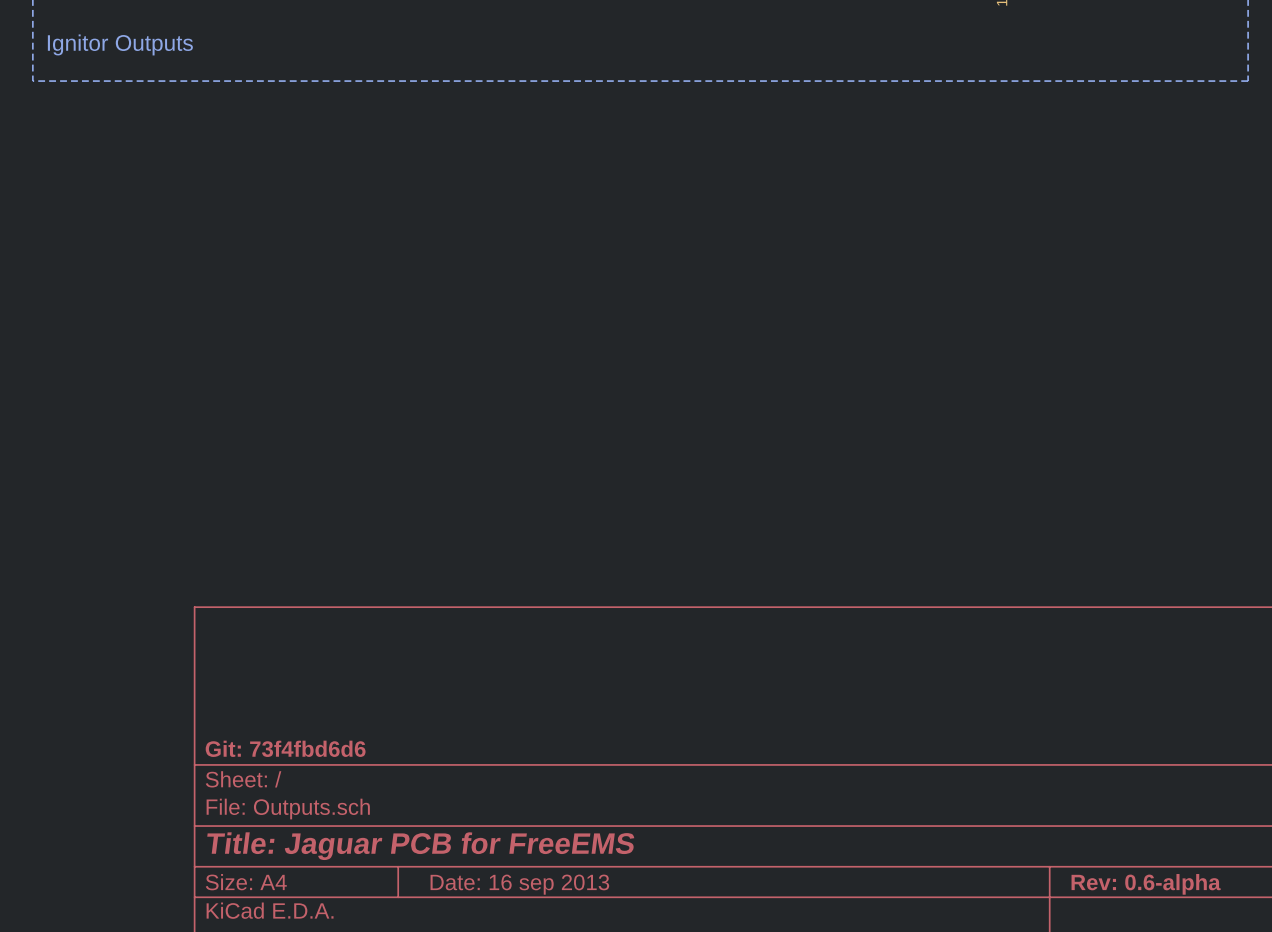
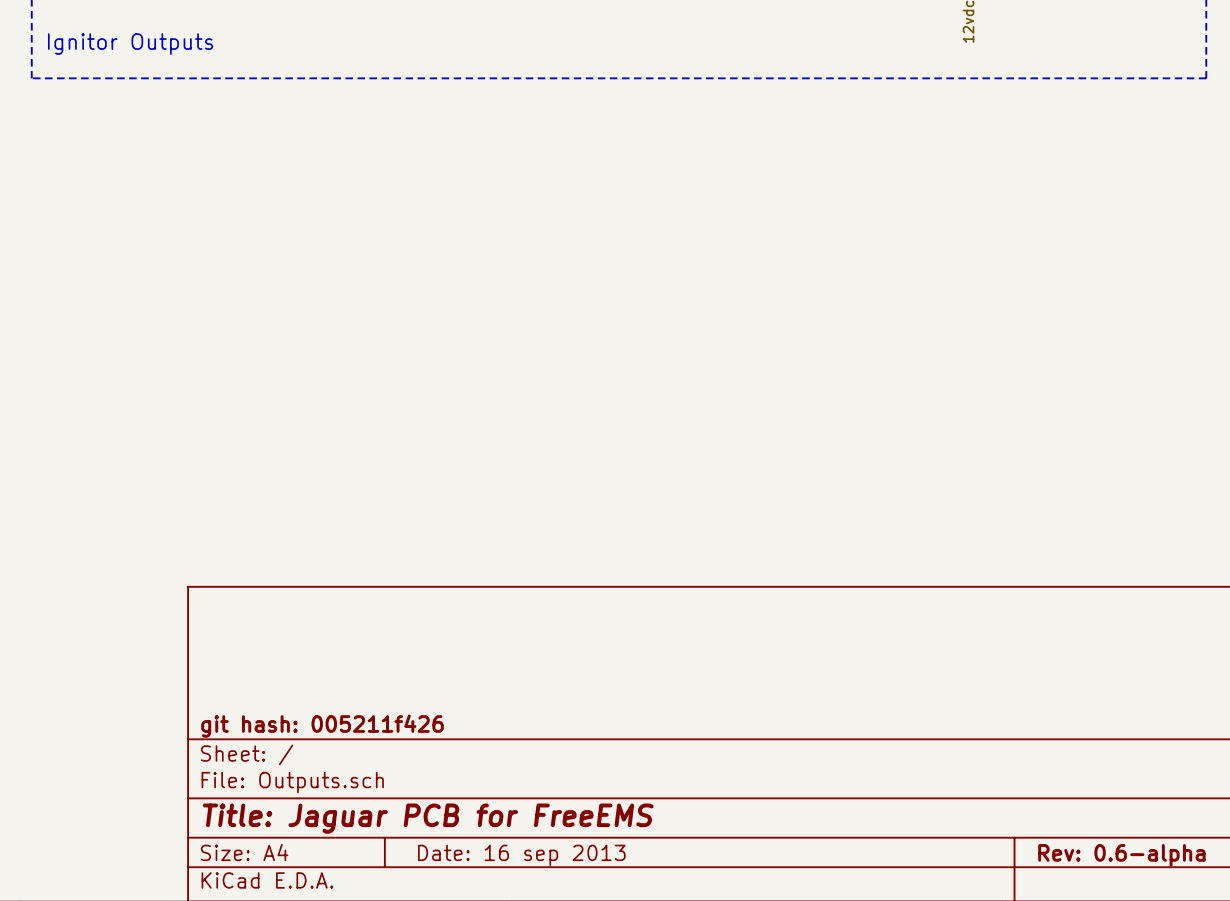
title block: Git: 73f4fbd6d6 (285, 748) -> git hash: 005211f426 (322, 726)

